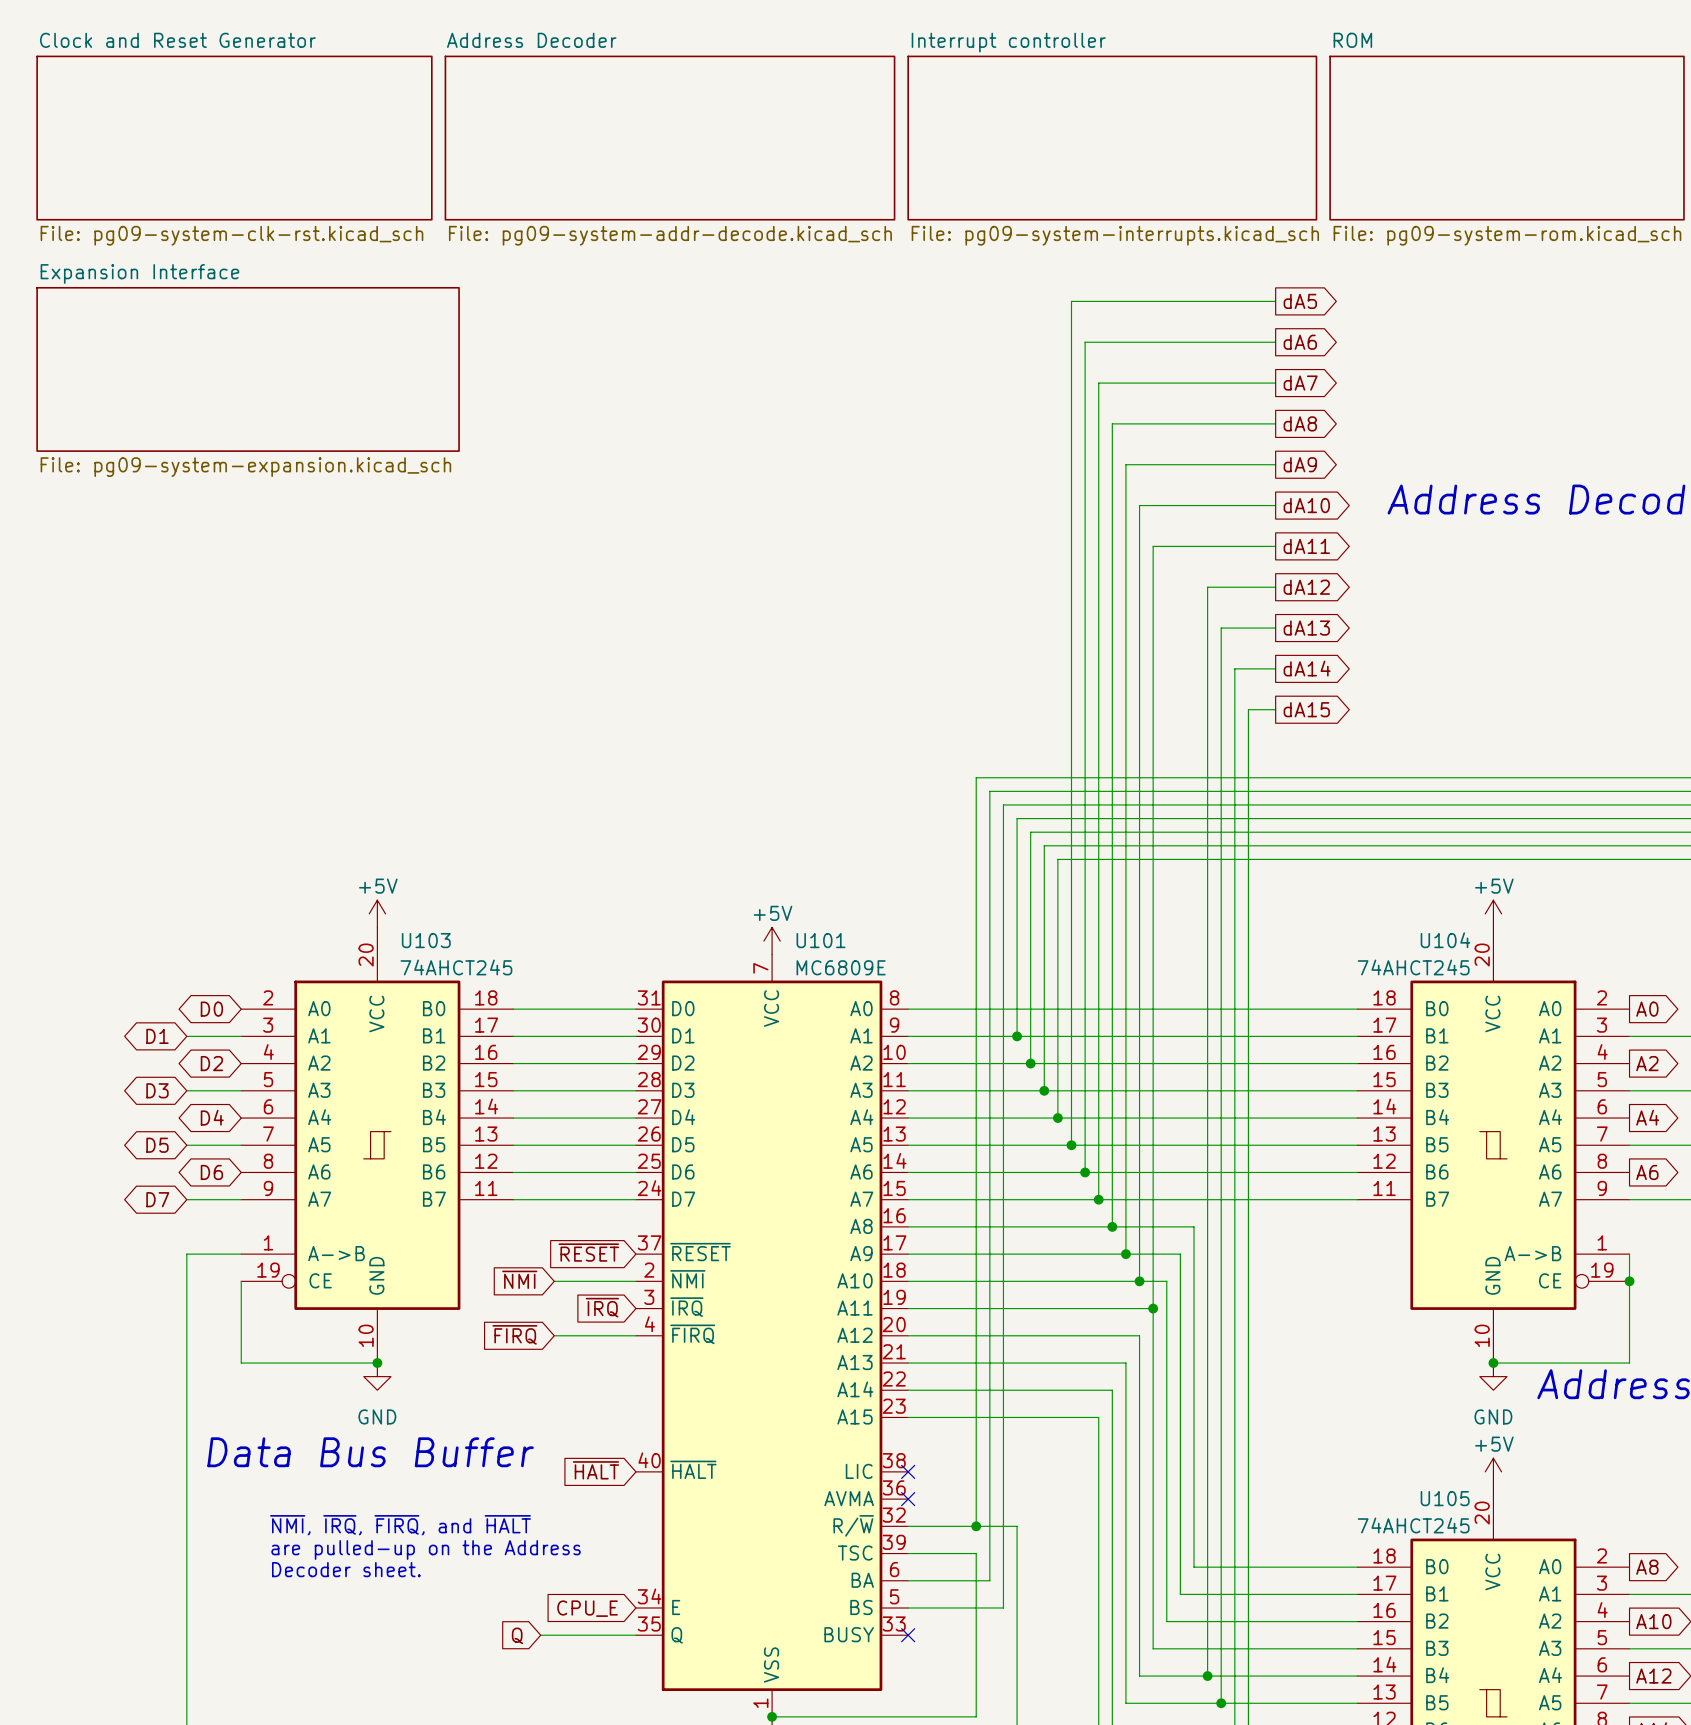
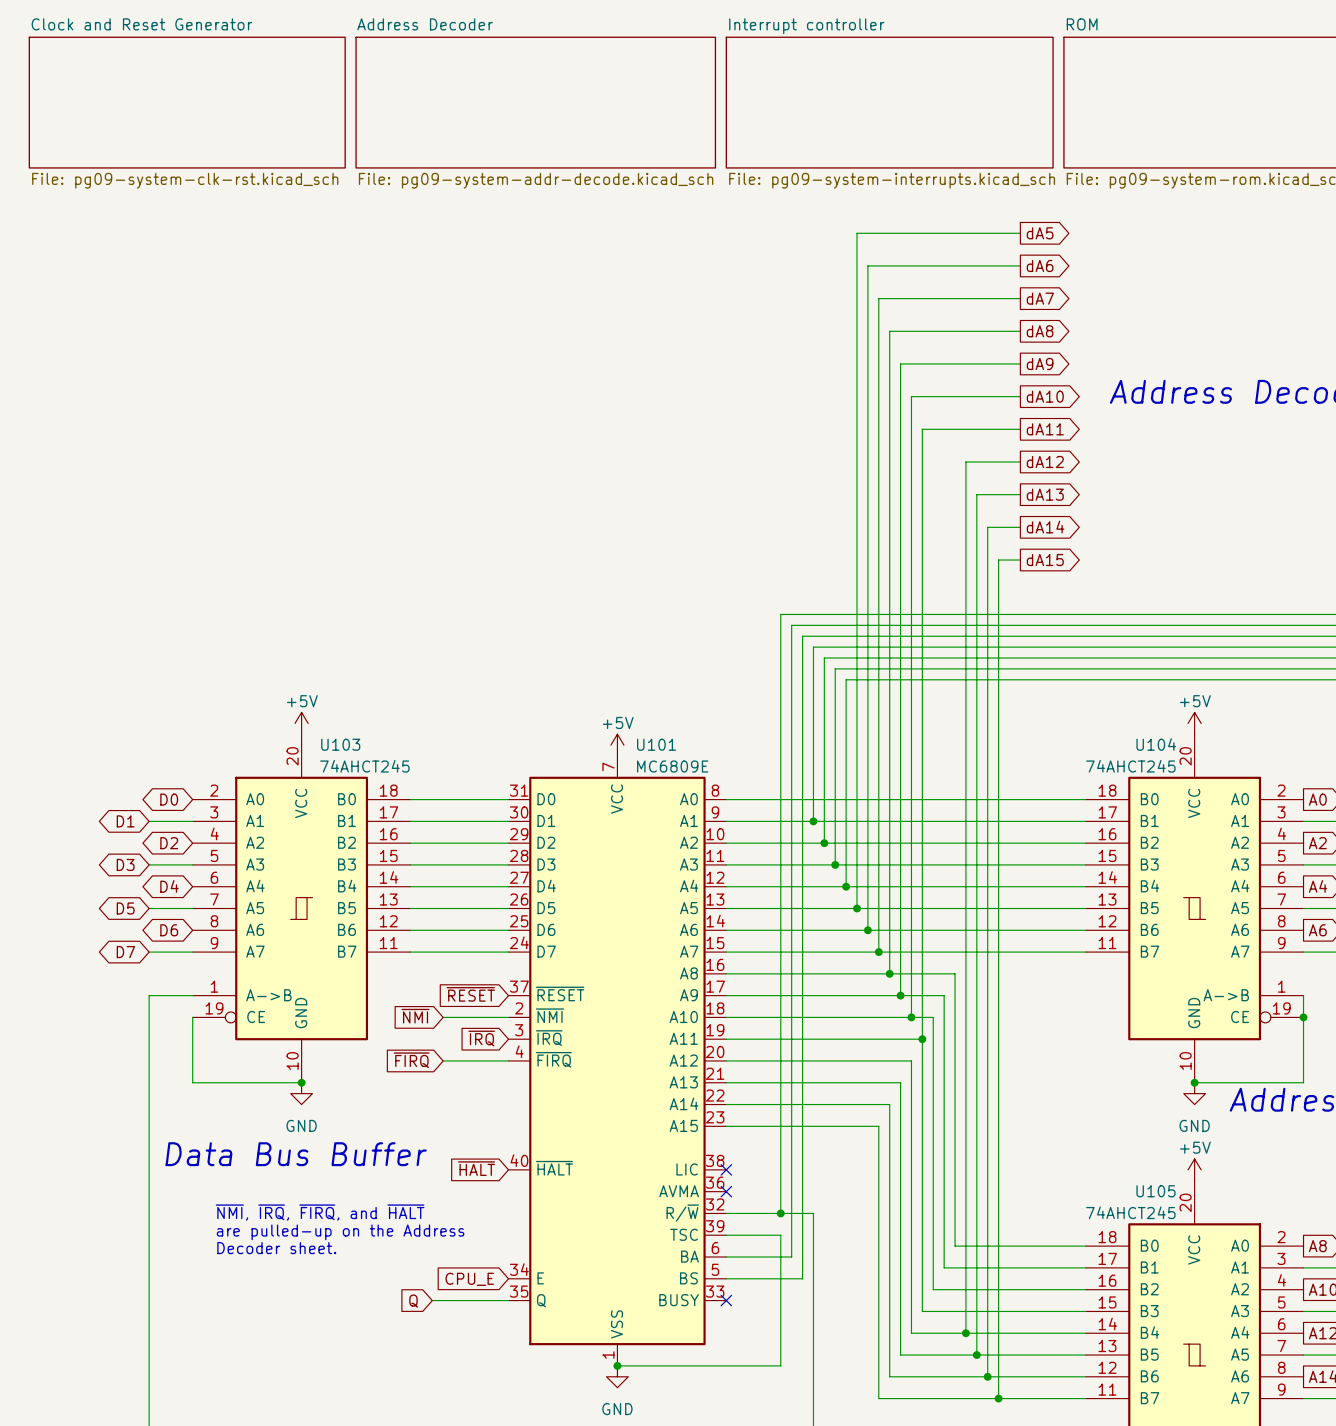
sheet Expansion Interface: File: pg09-system-expansion.kicad_sch (248, 369) -> none

